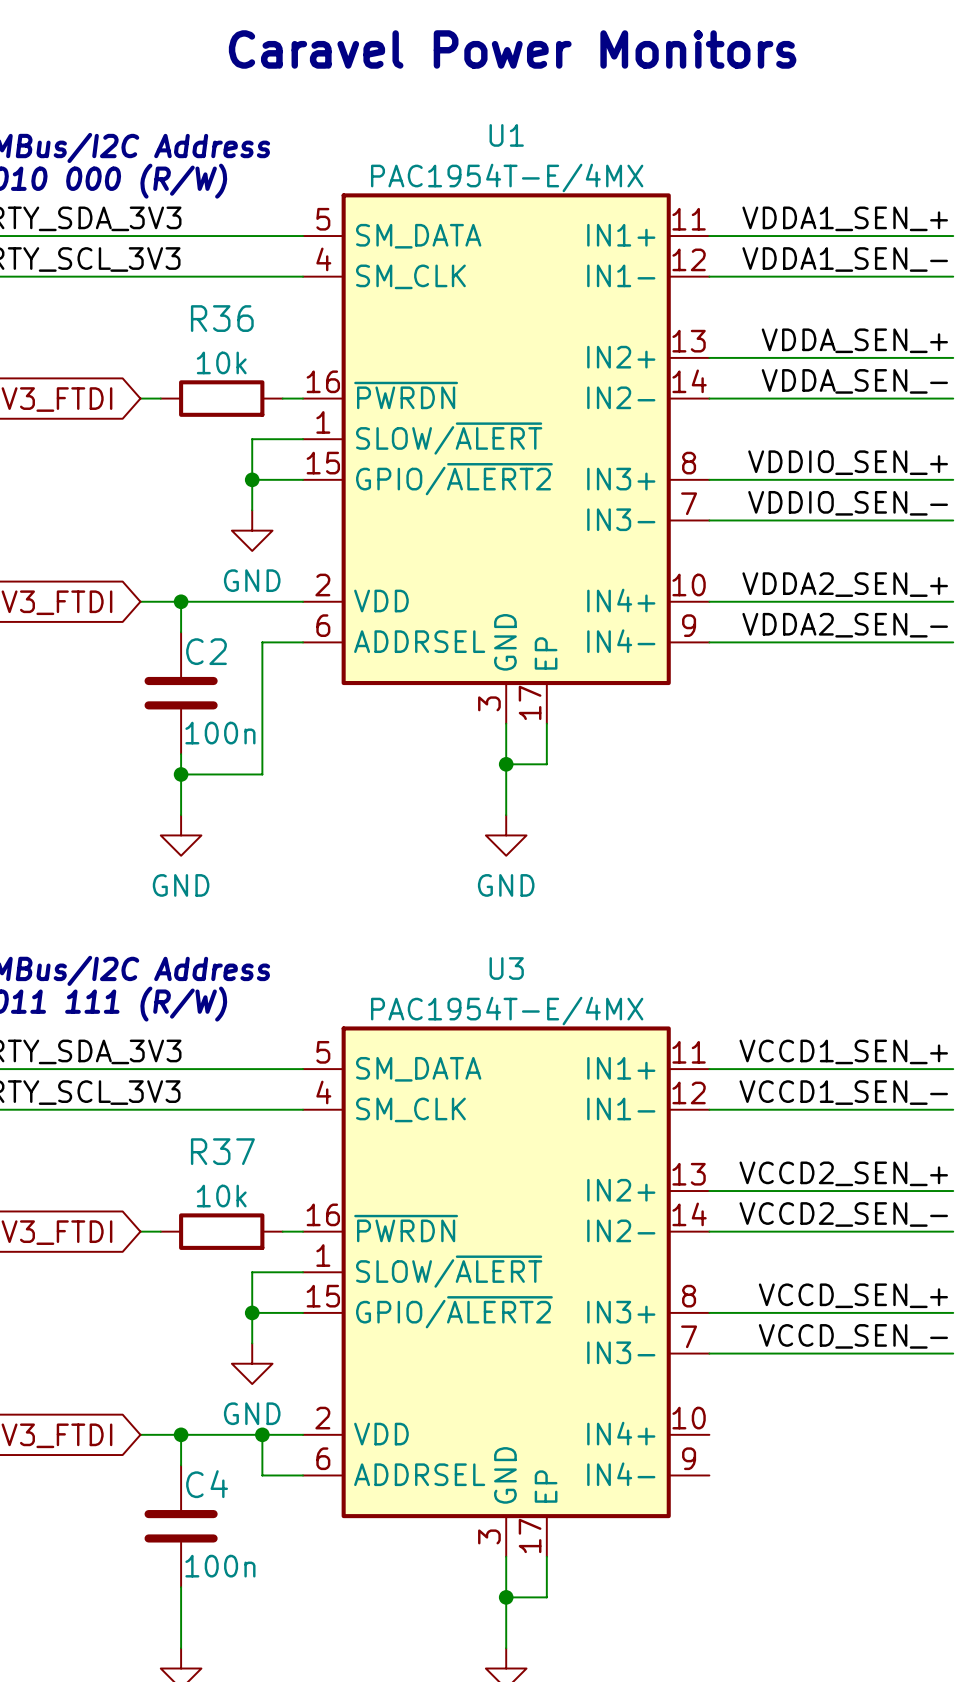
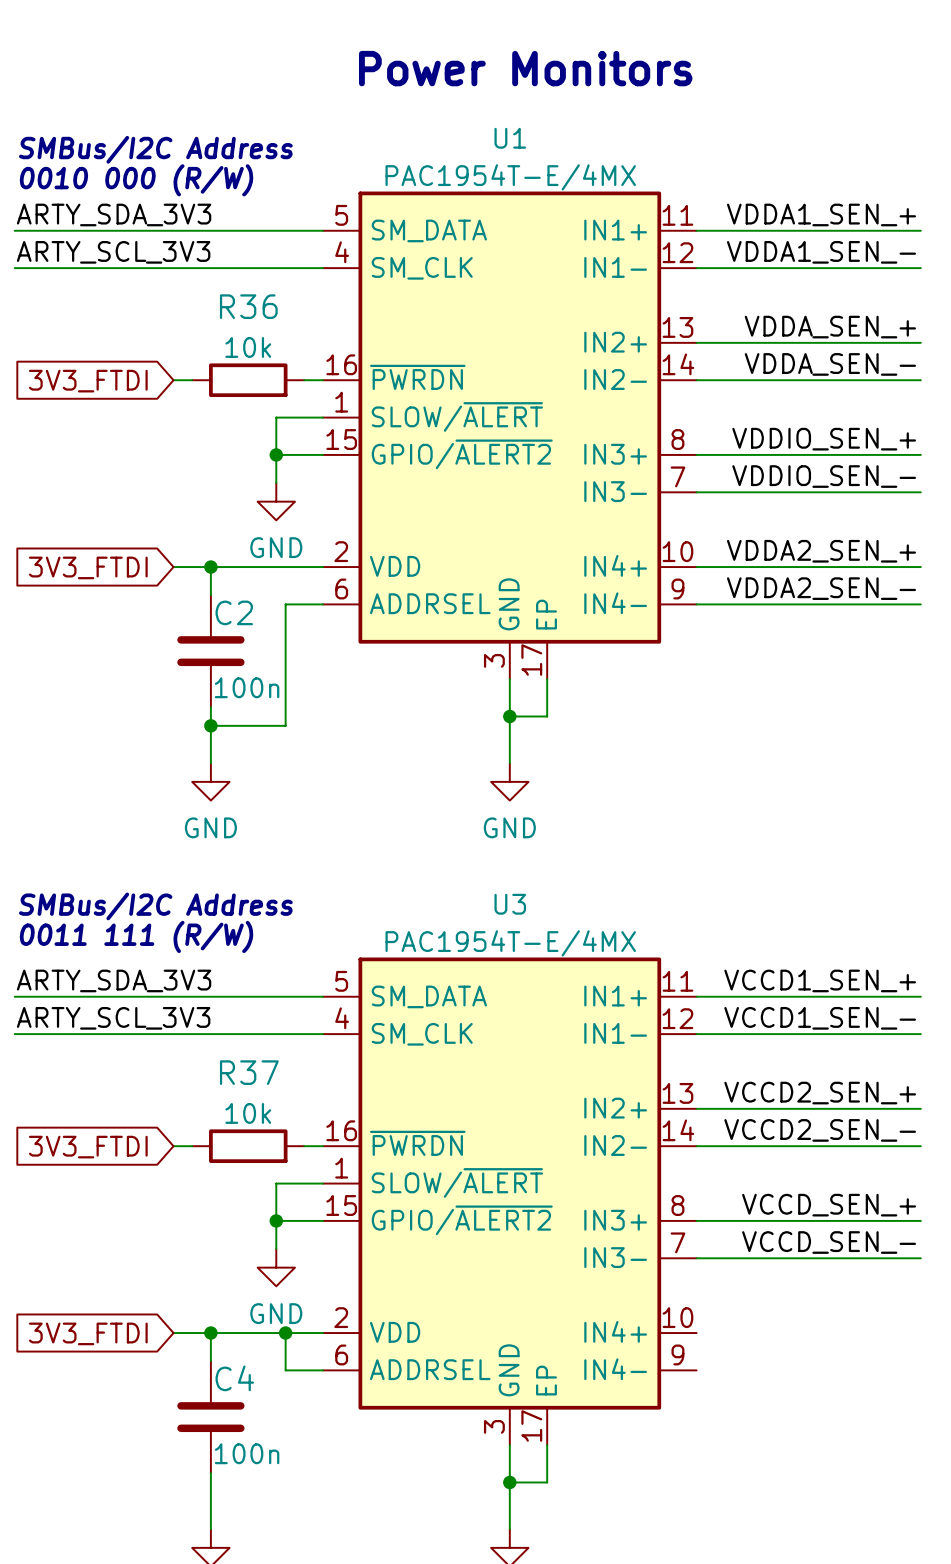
text: Caravel Power Monitors (512, 49) -> Power Monitors (525, 68)

